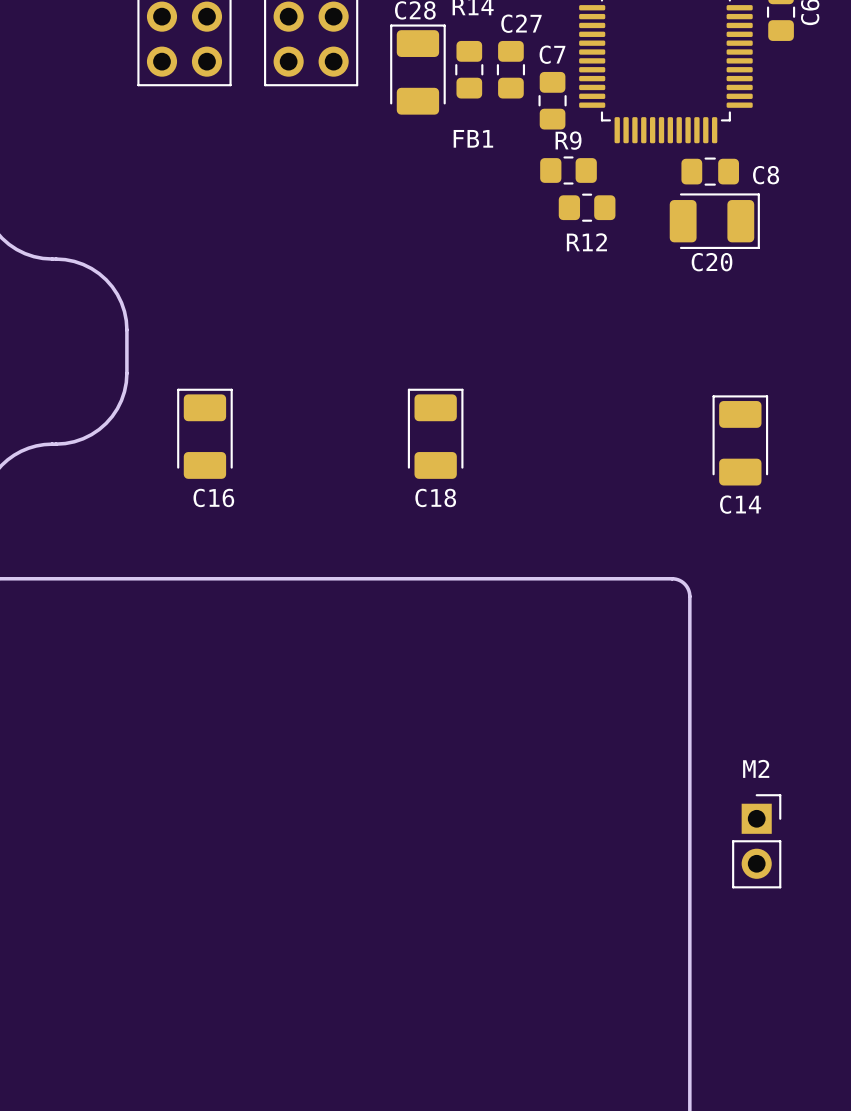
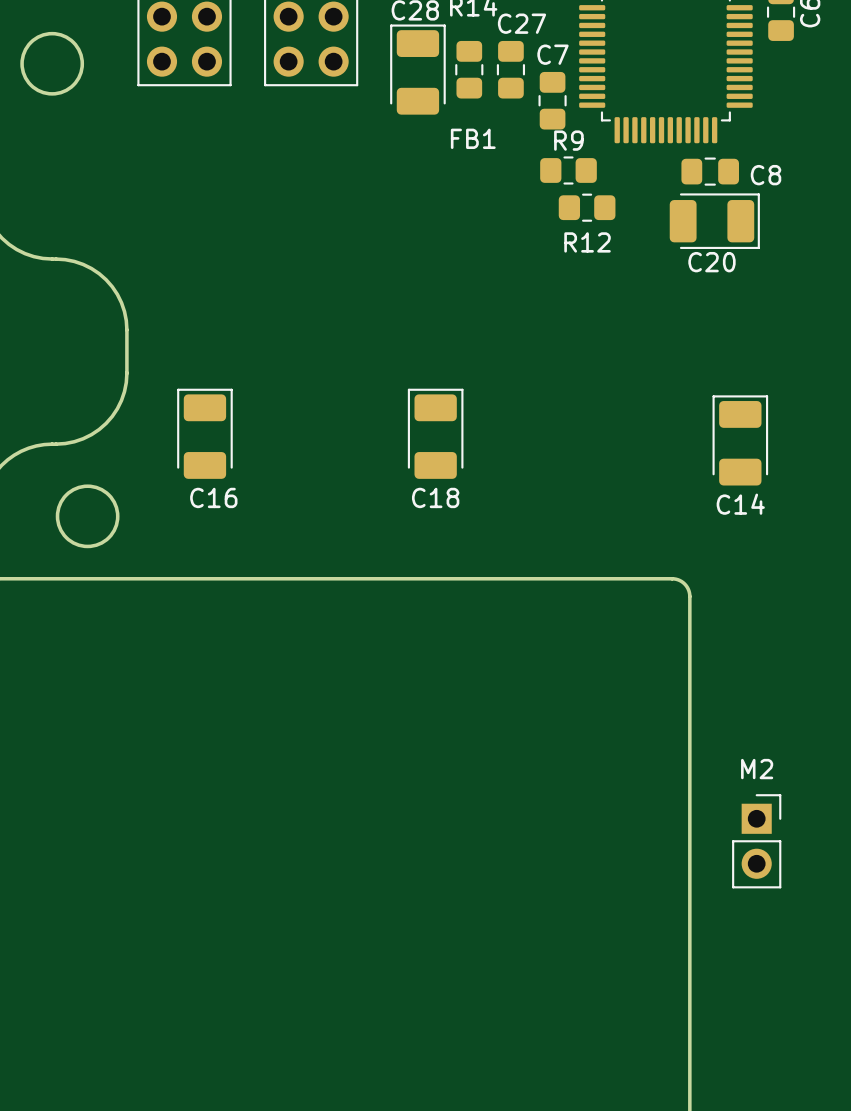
round board edge: none -> [20, 31, 85, 96]
round board edge: none -> [55, 484, 120, 549]

